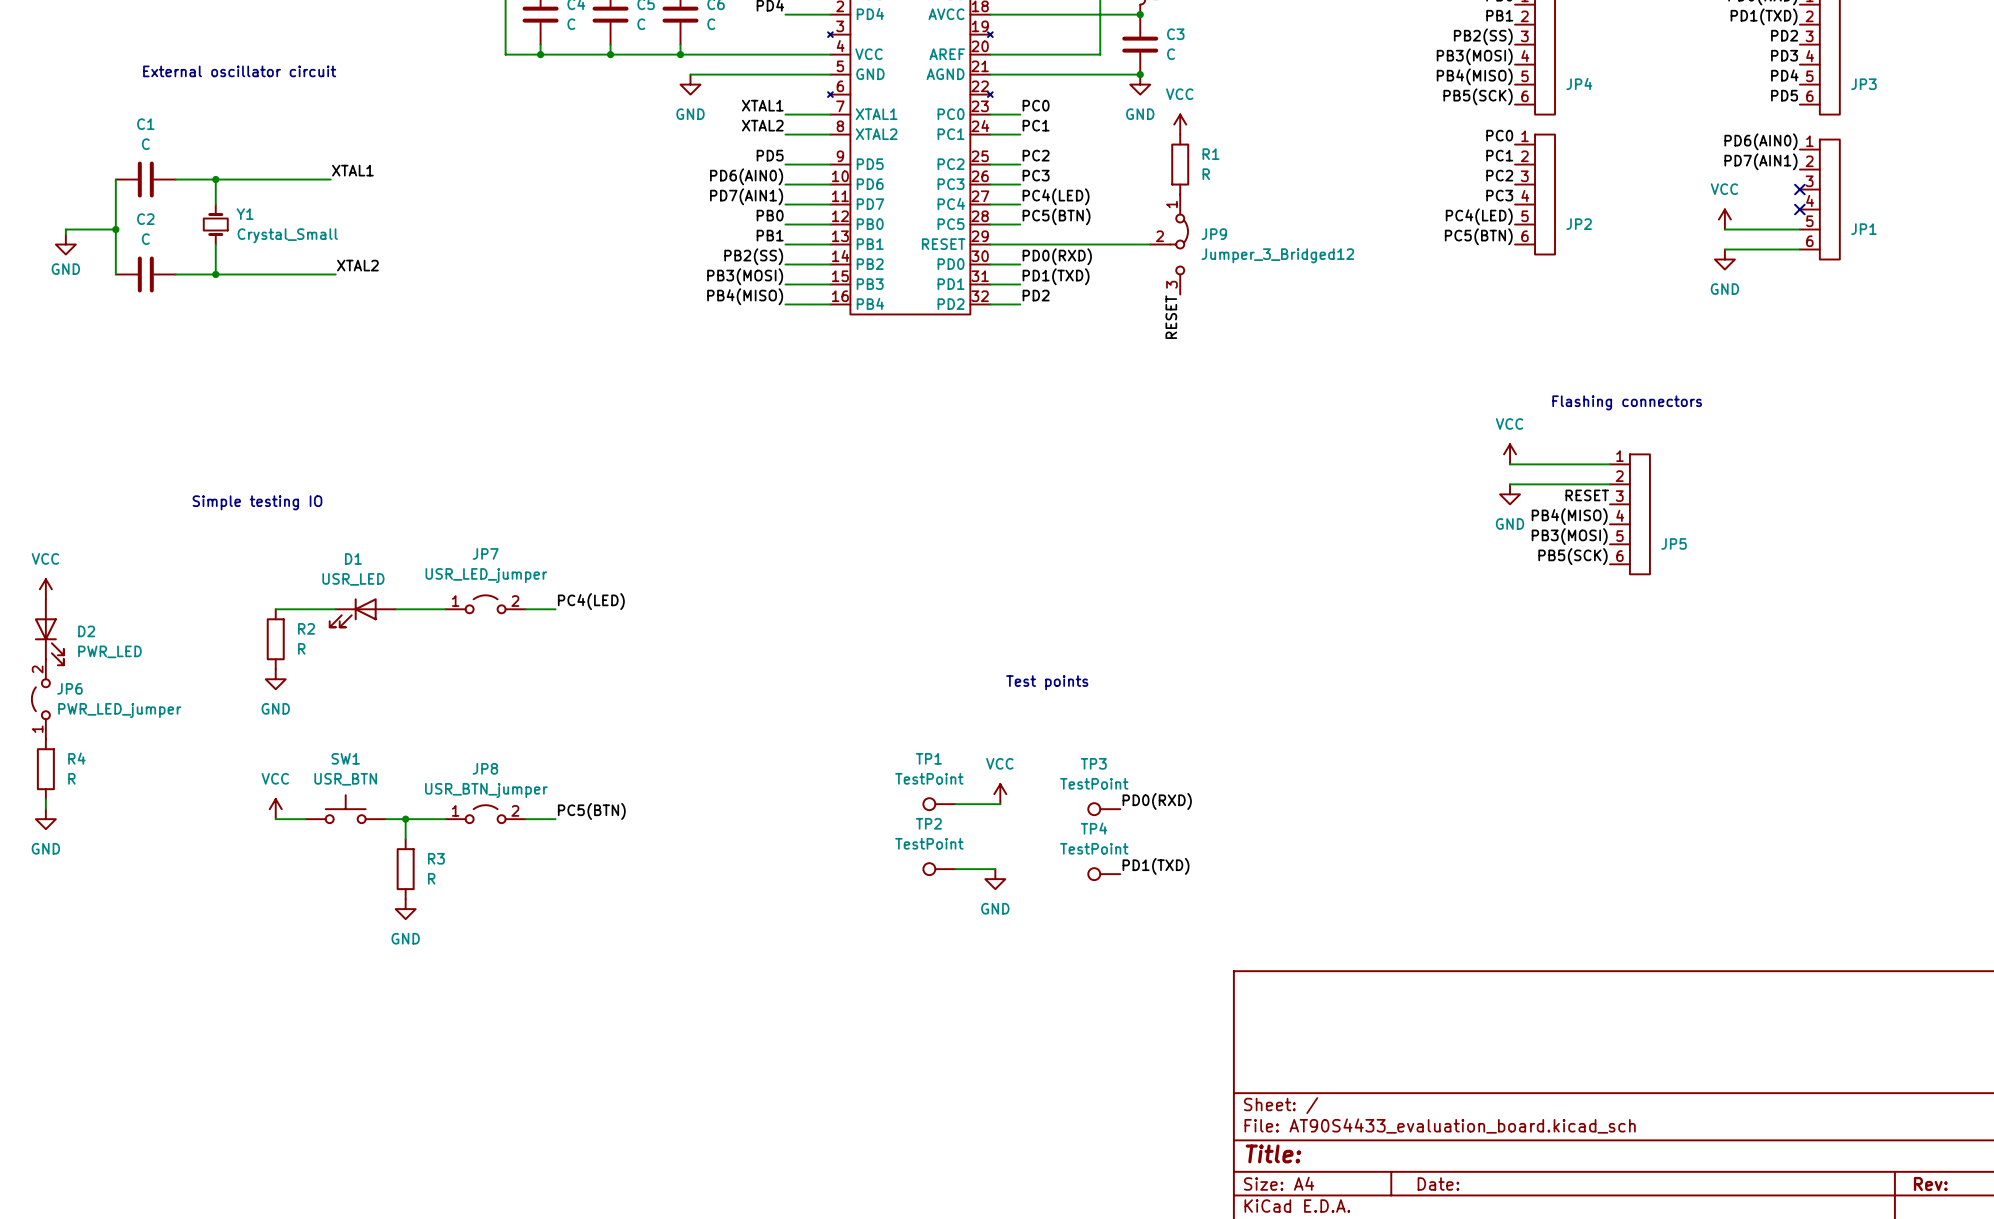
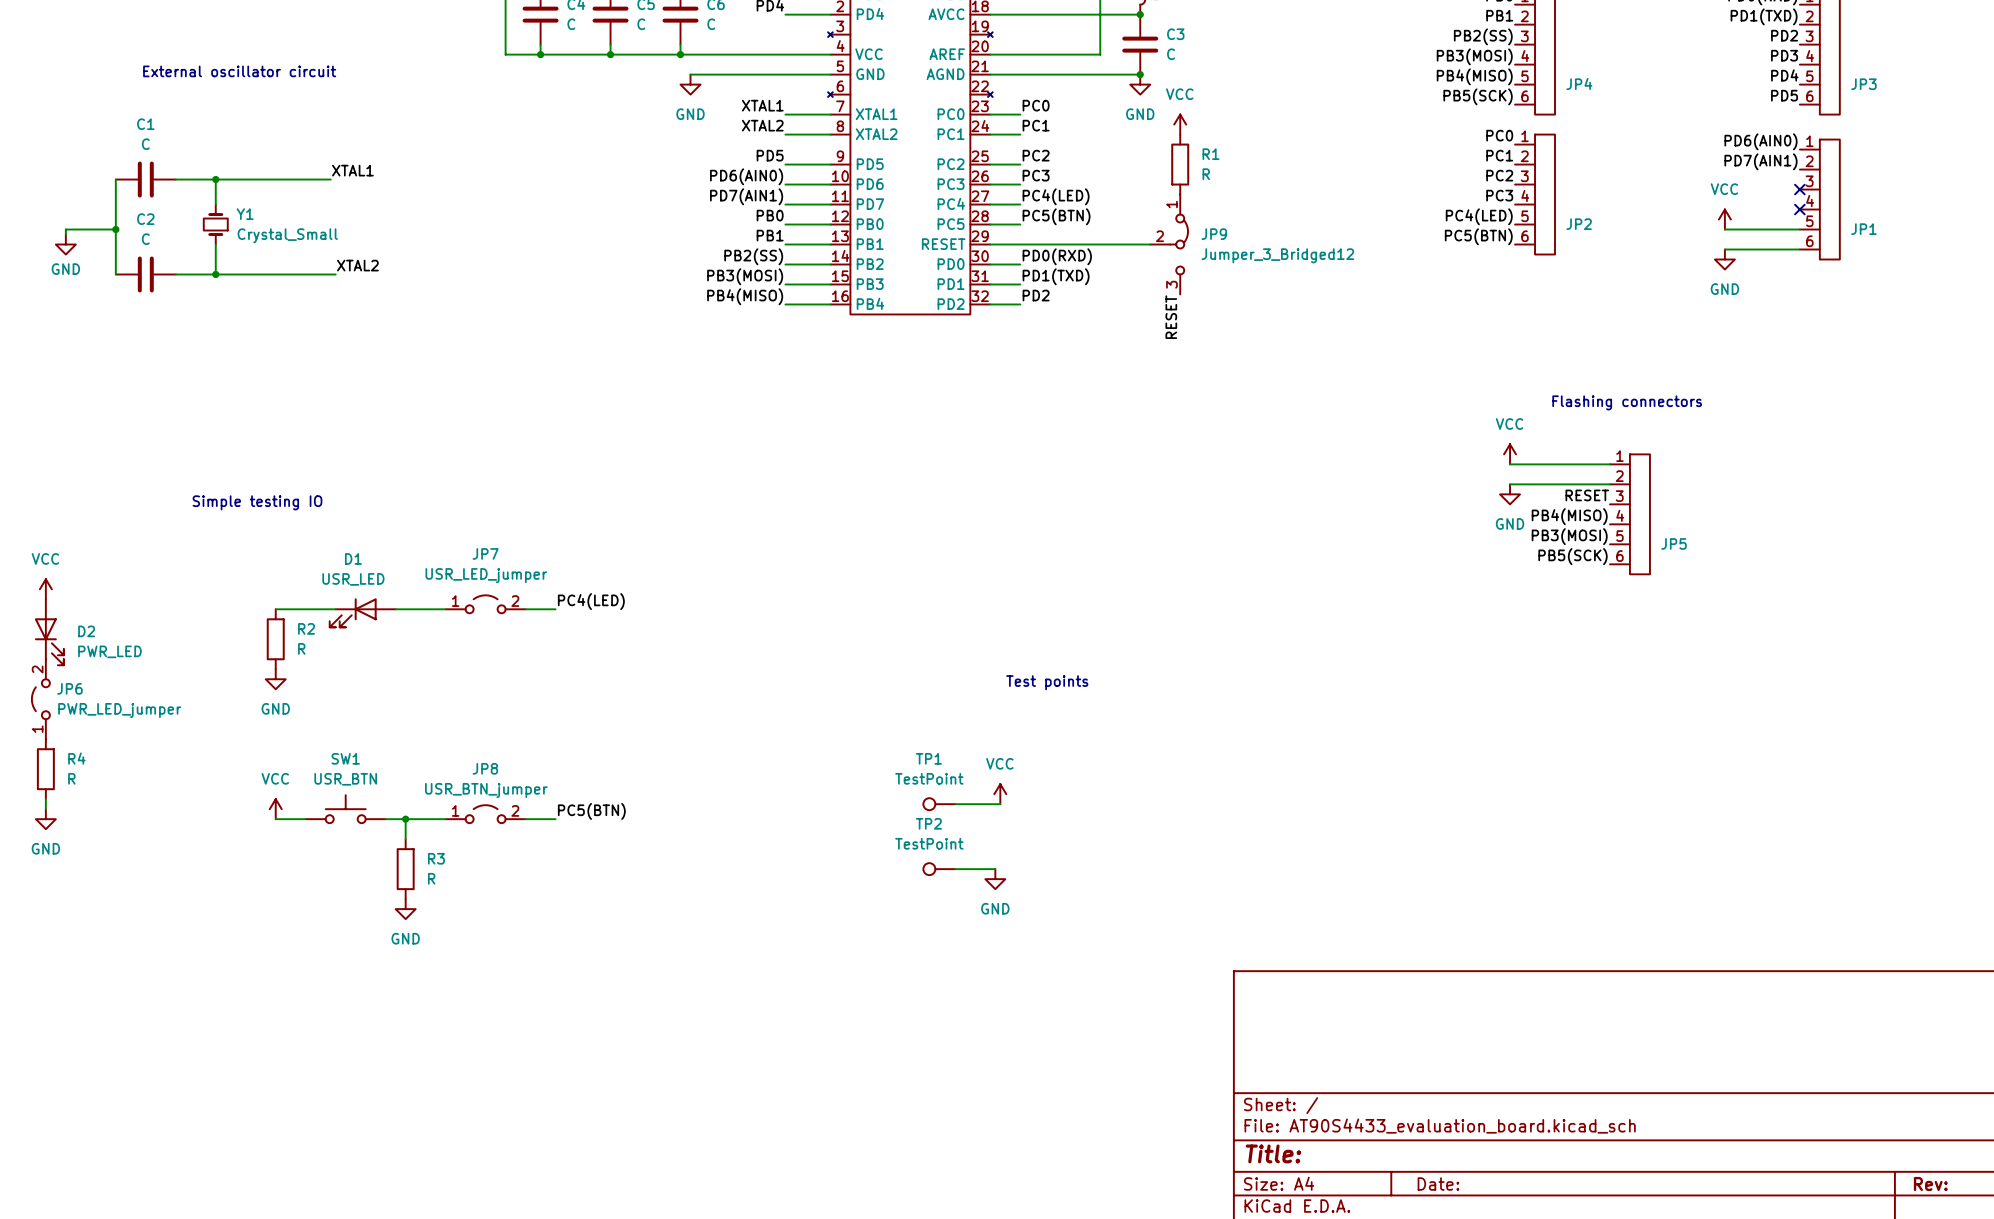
label: PD0(RXD) (1157, 801) -> none
TP3: TestPoint (1104, 809) -> none
label: PD1(TXD) (1156, 866) -> none
TP4: TestPoint (1104, 874) -> none

